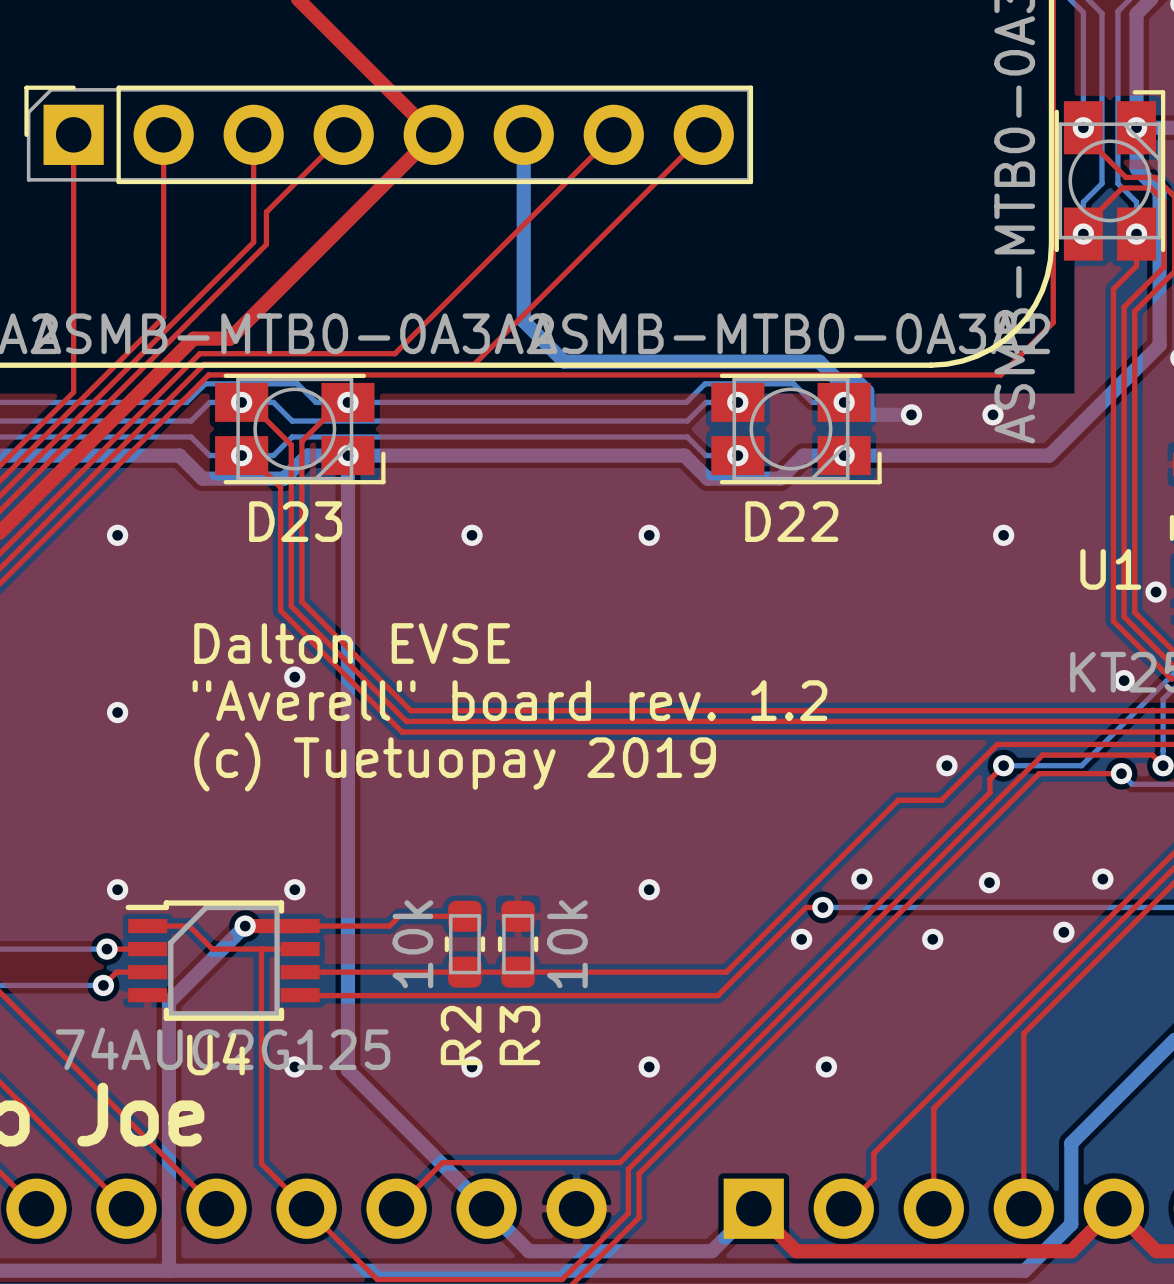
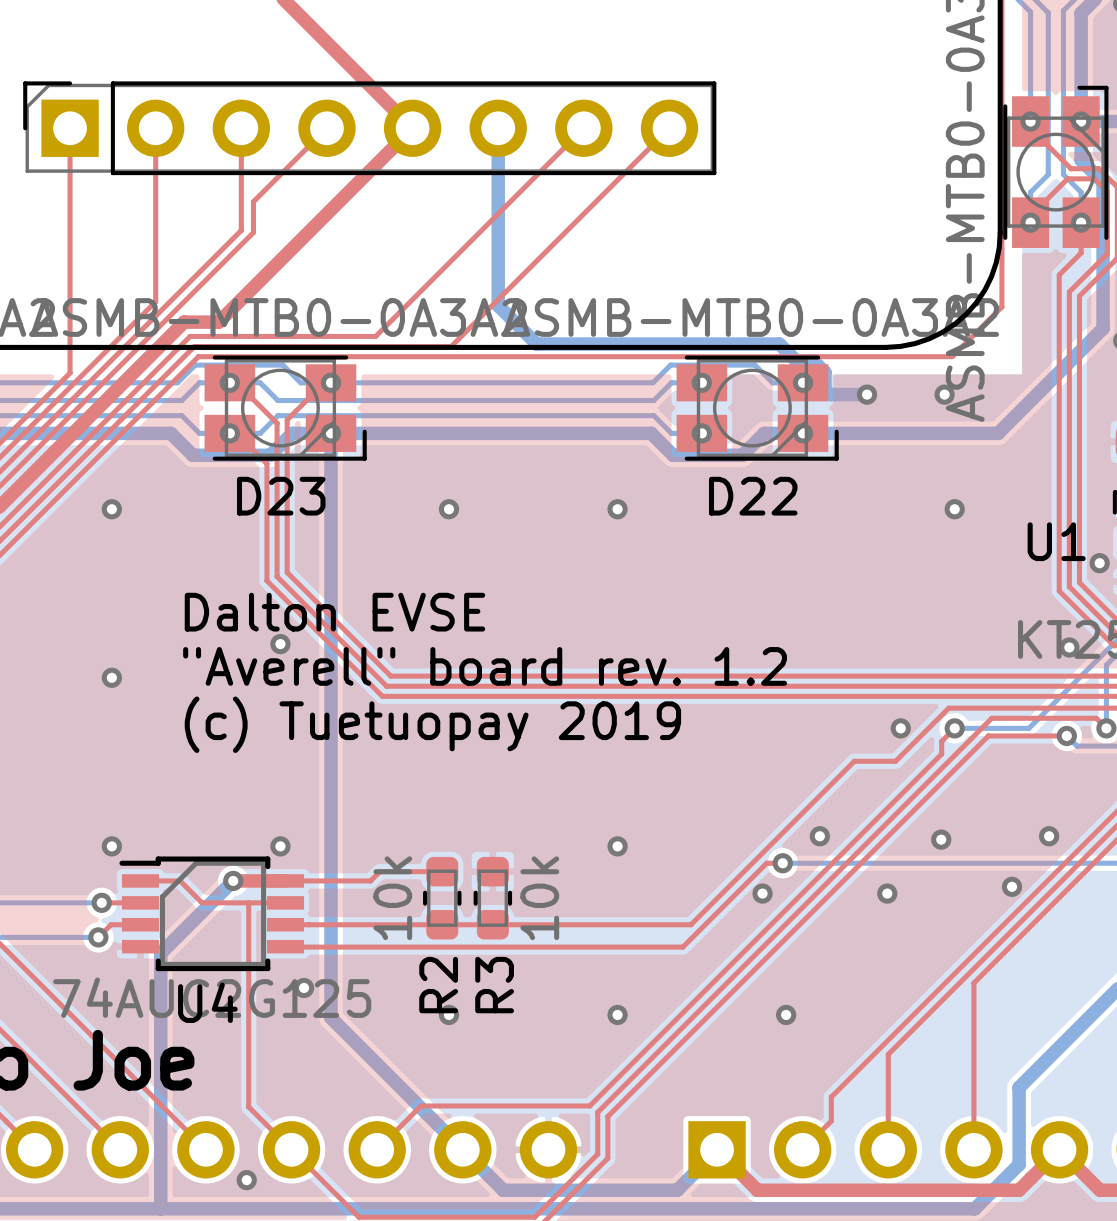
via position: (294, 1066) -> (304, 987)
via: none -> (246, 1180)

